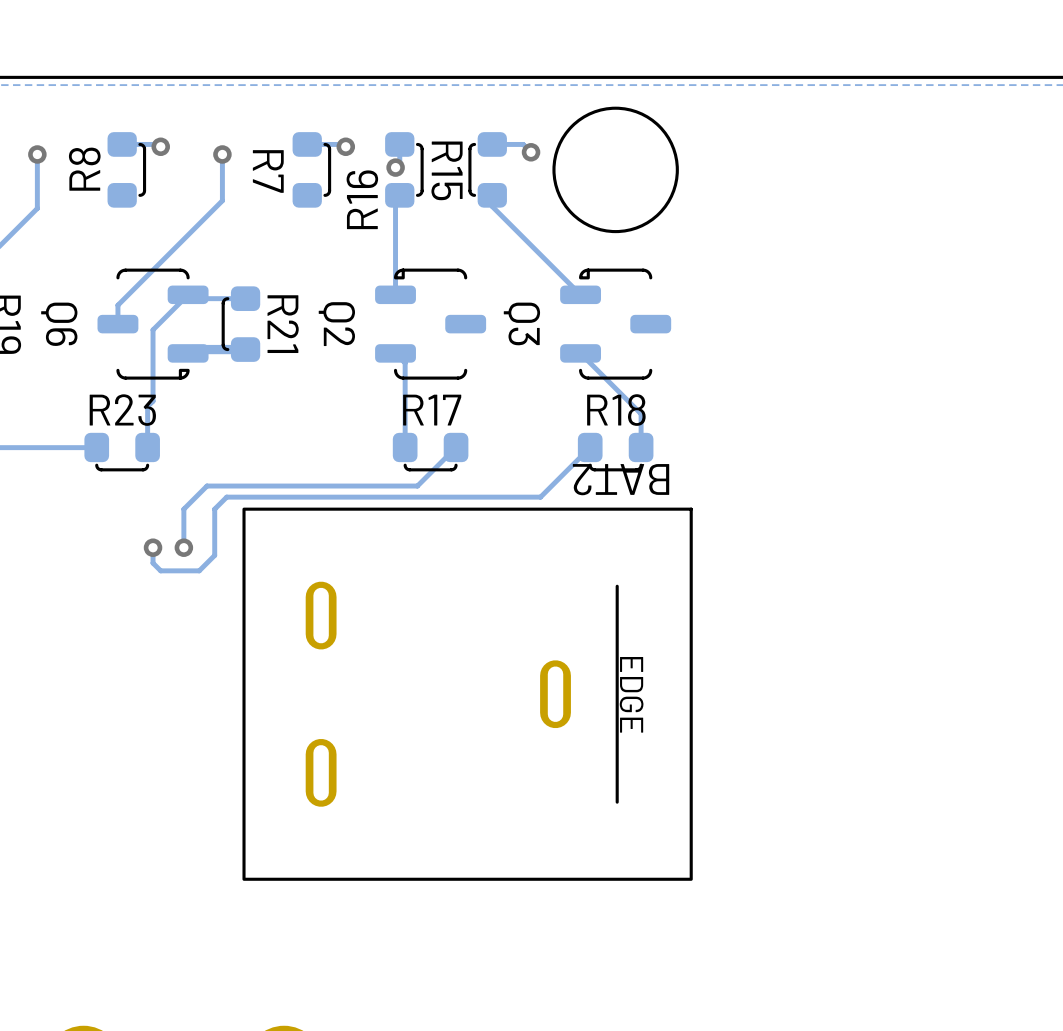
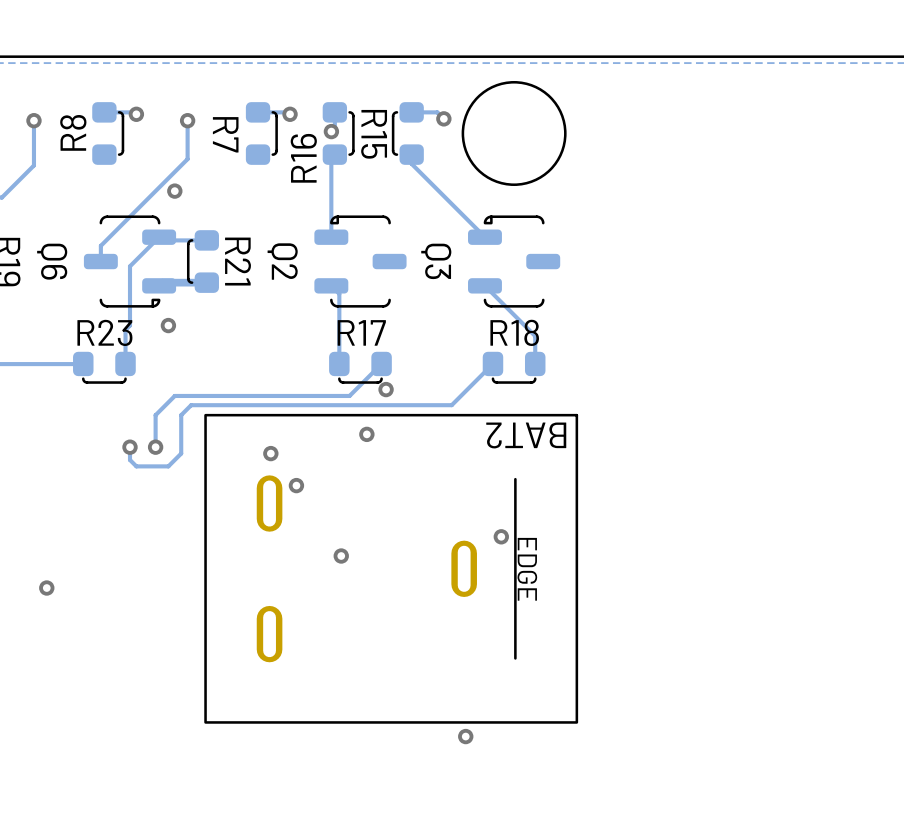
via: none -> (174, 191)
via: none -> (168, 325)
via: none -> (386, 389)
BAT2 name position: BAT2 (621, 479) -> BAT2 (526, 435)
via: none -> (366, 434)
via: none -> (270, 453)
via: none -> (296, 485)
via: none -> (501, 536)
via: none -> (341, 556)
via: none -> (46, 588)
via: none -> (465, 736)

